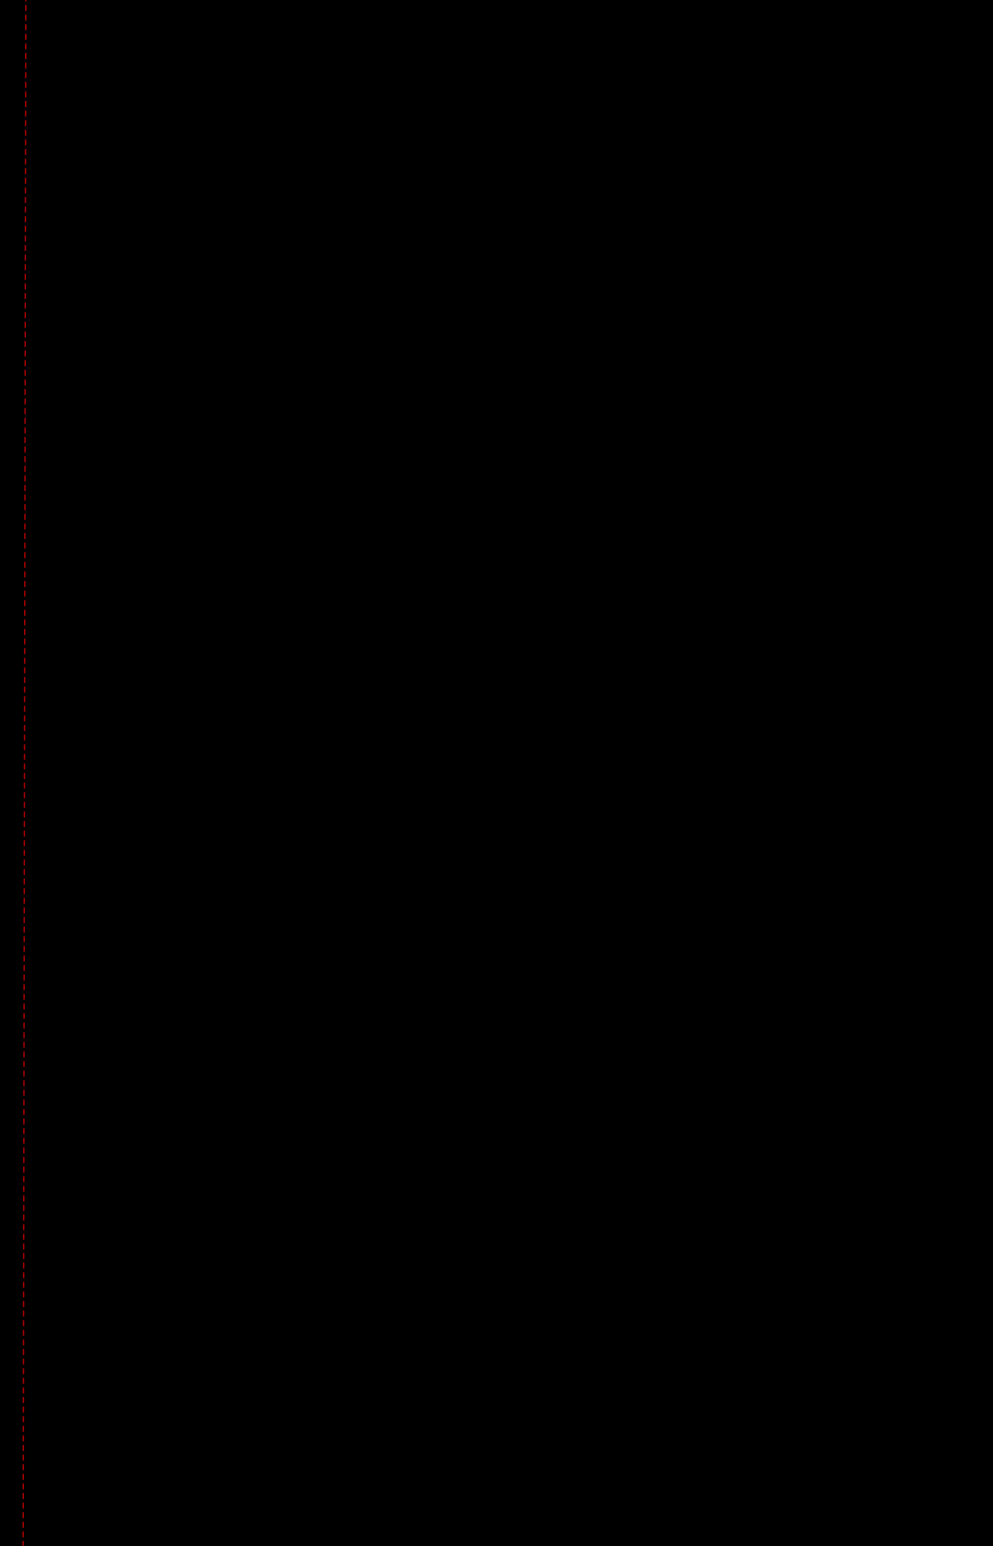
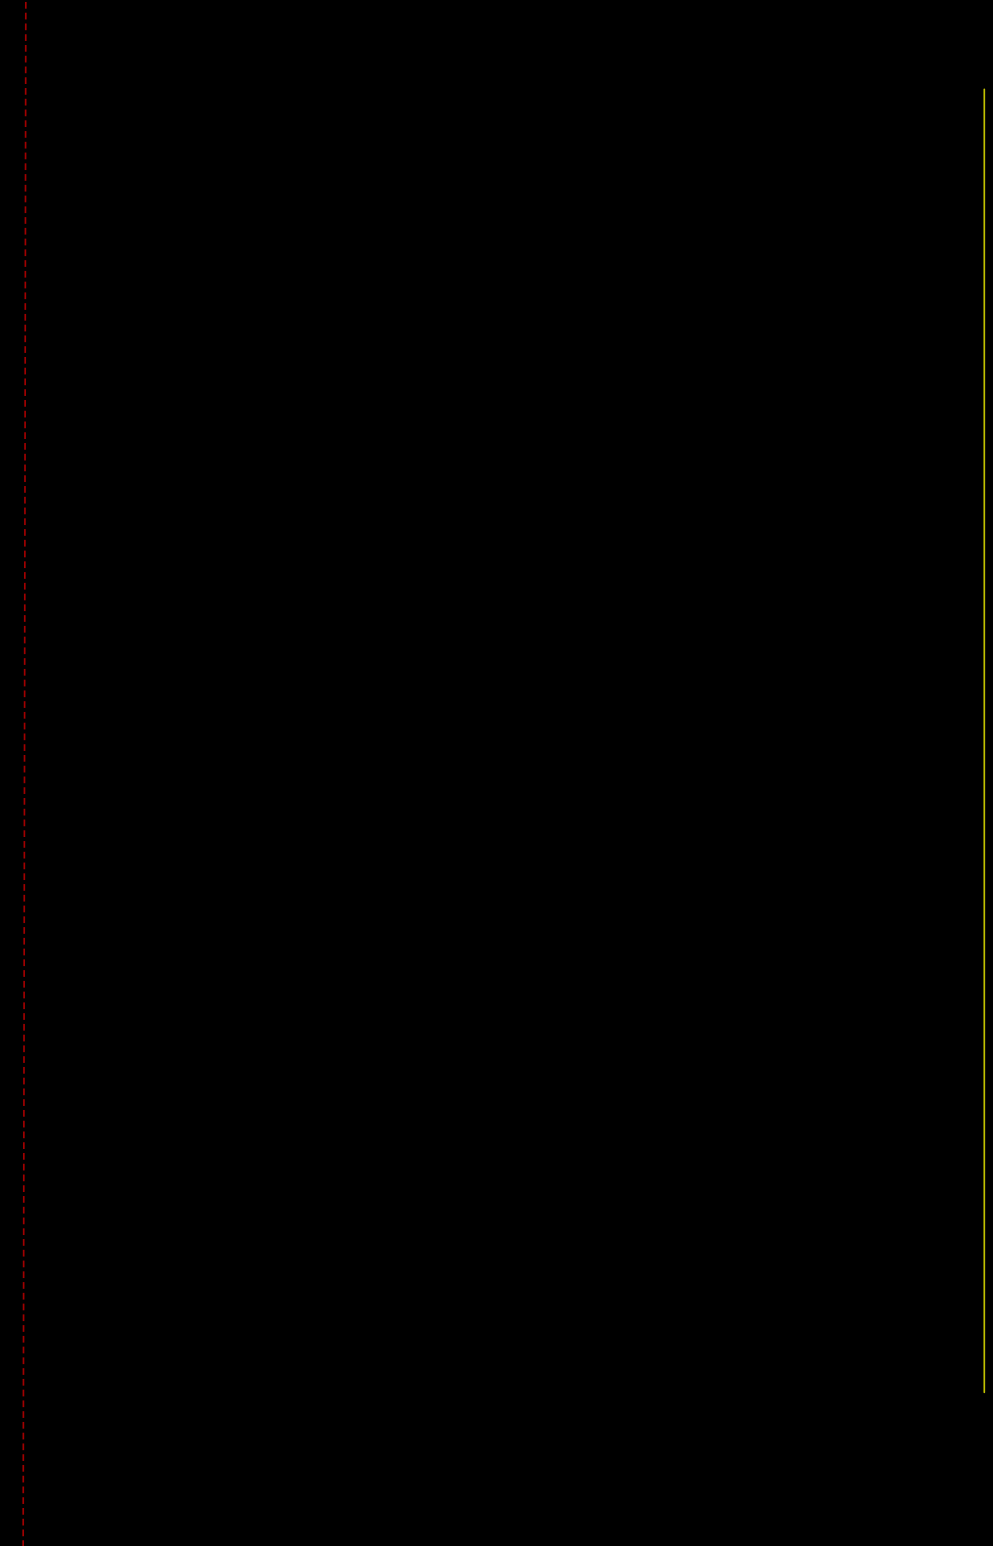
board edge: none -> (984, 89) (984, 1392)

